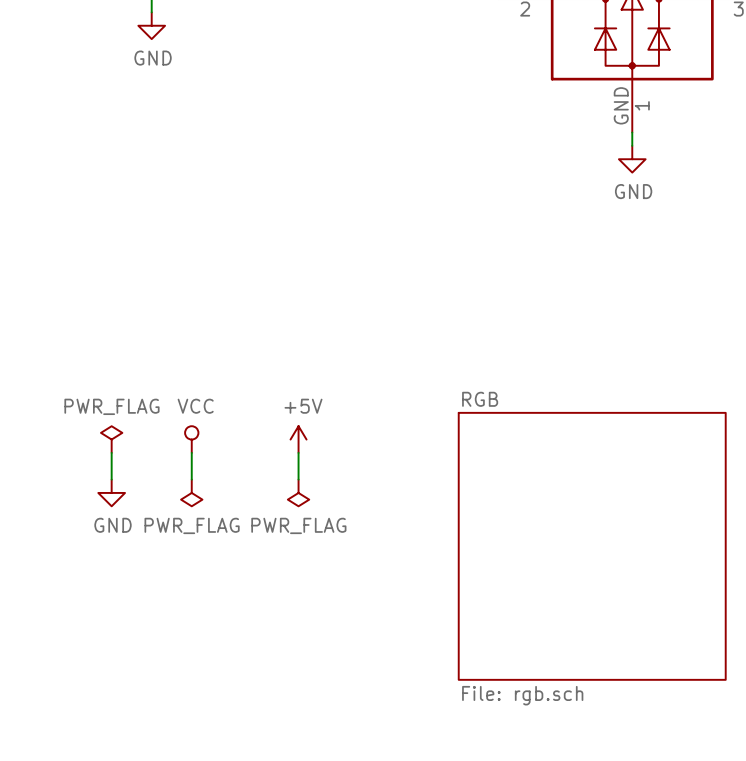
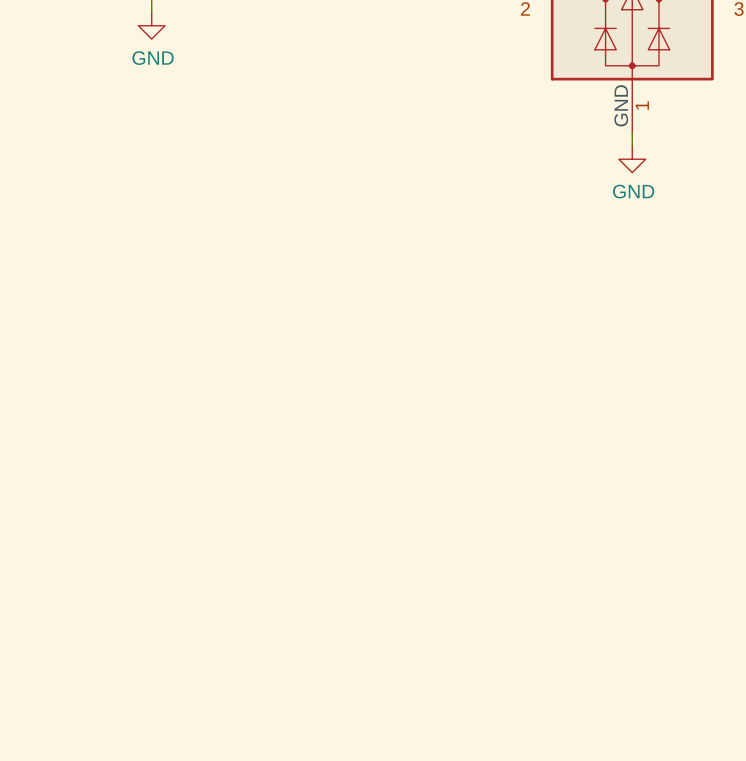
power symbol: PWR_FLAG (111, 439) -> none
power symbol: VCC (191, 439) -> none
power symbol: +5V (298, 439) -> none
wire: (111, 452) (111, 479) -> none
wire: (191, 452) (191, 479) -> none
wire: (298, 452) (298, 479) -> none
power symbol: GND (111, 492) -> none
power symbol: PWR_FLAG (191, 492) -> none
power symbol: PWR_FLAG (298, 492) -> none
sheet RGB: File: rgb.sch (592, 546) -> none

